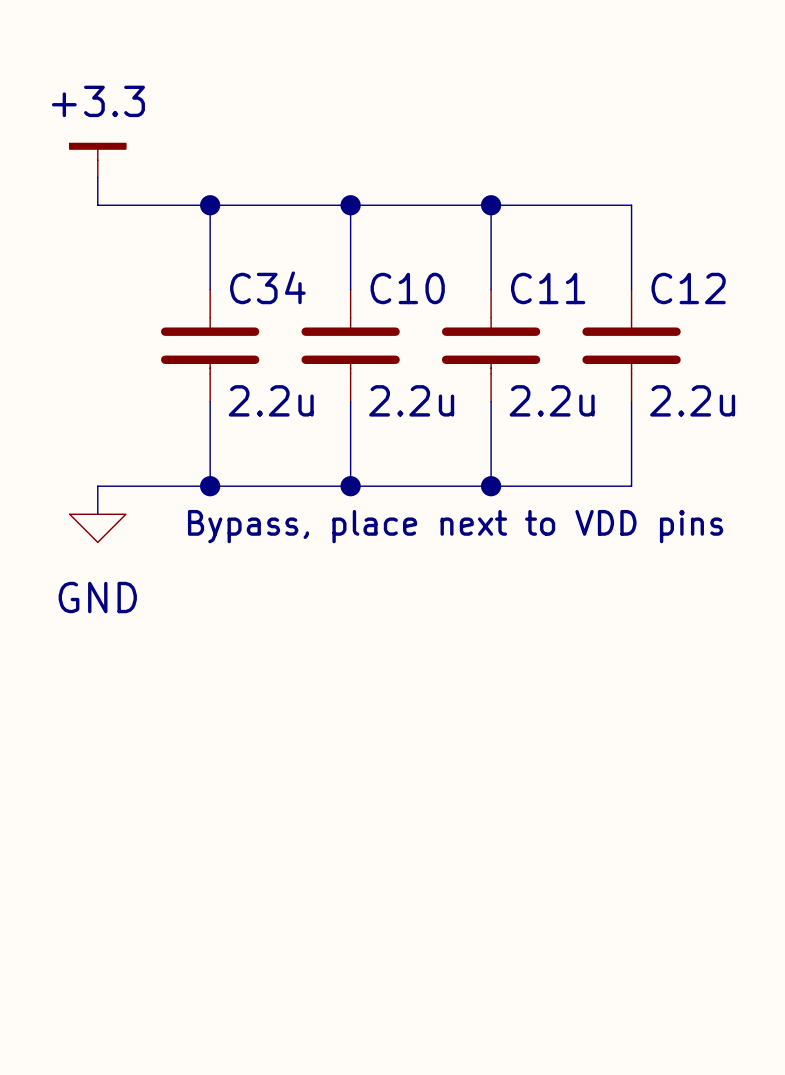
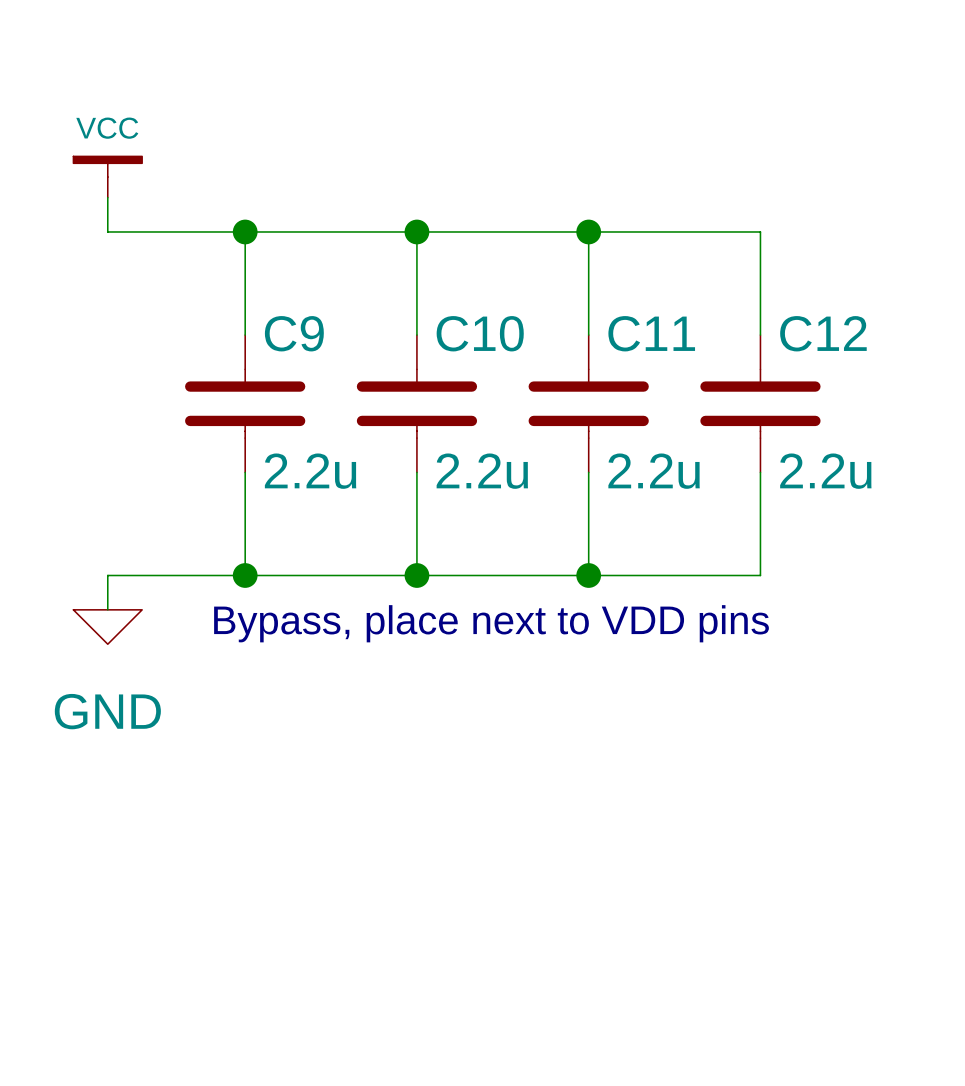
power symbol: +3.3 (97, 160) -> VCC (107, 177)
C34 name: C34 (267, 287) -> C9 (294, 333)

